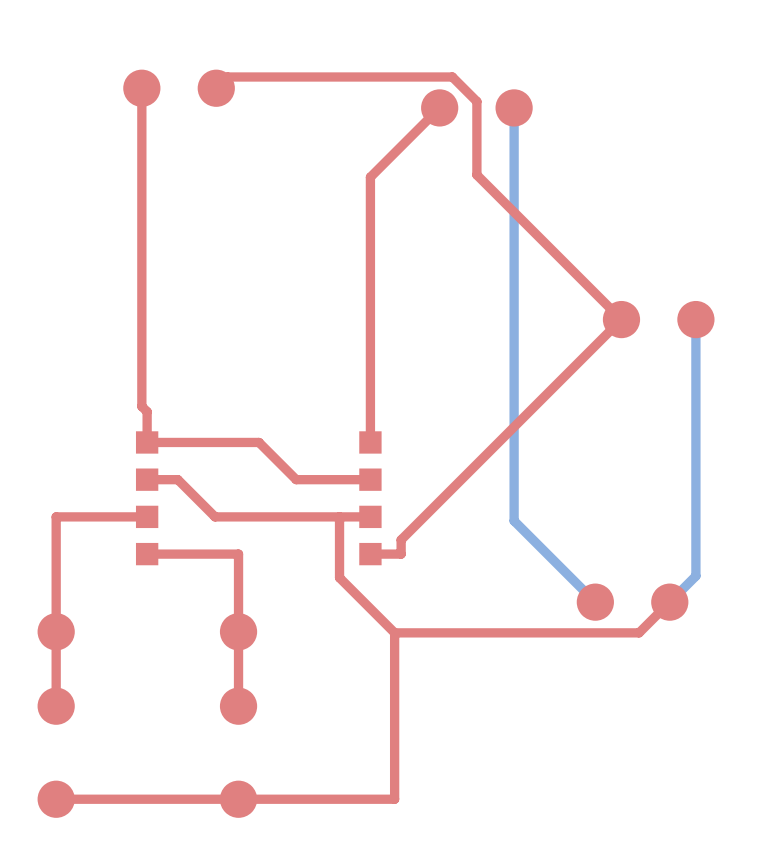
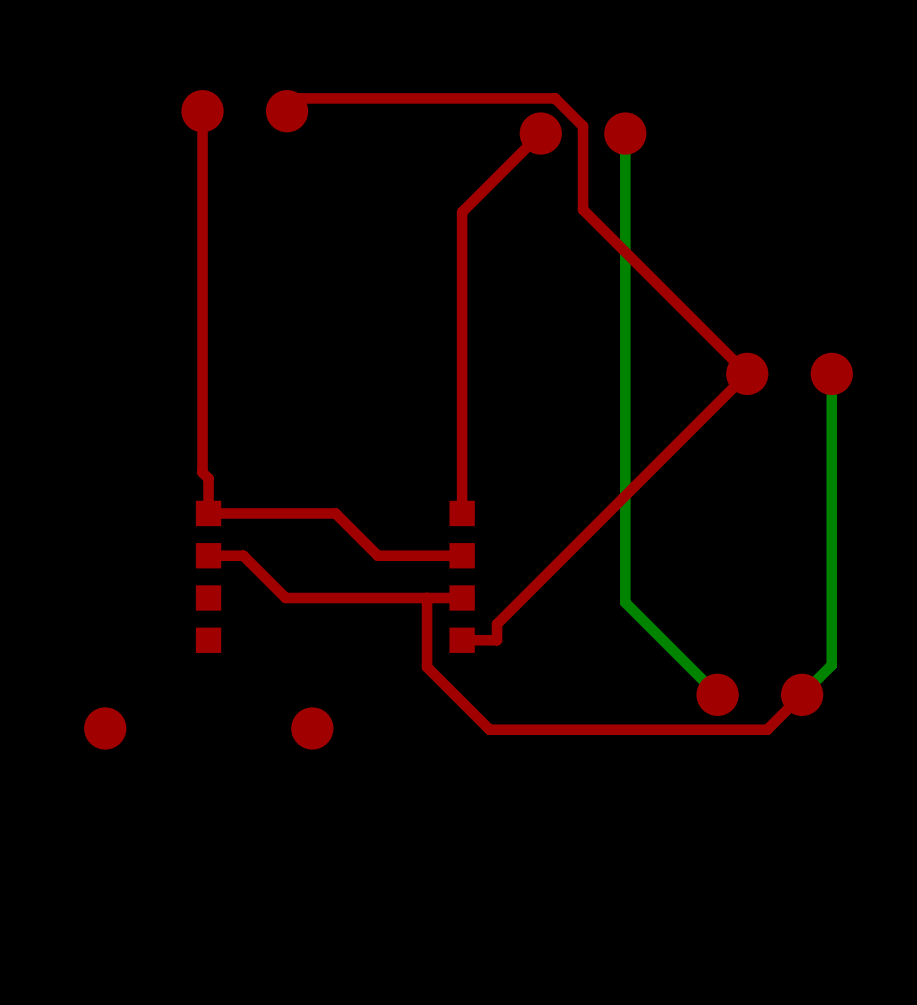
top track: (147, 516) (56, 516) (56, 706) -> none
top track: (147, 554) (238, 554) (238, 706) -> none
top track: (394, 632) (394, 799) (56, 799) -> none
part: (56, 752) -> none
part: (238, 752) -> none

